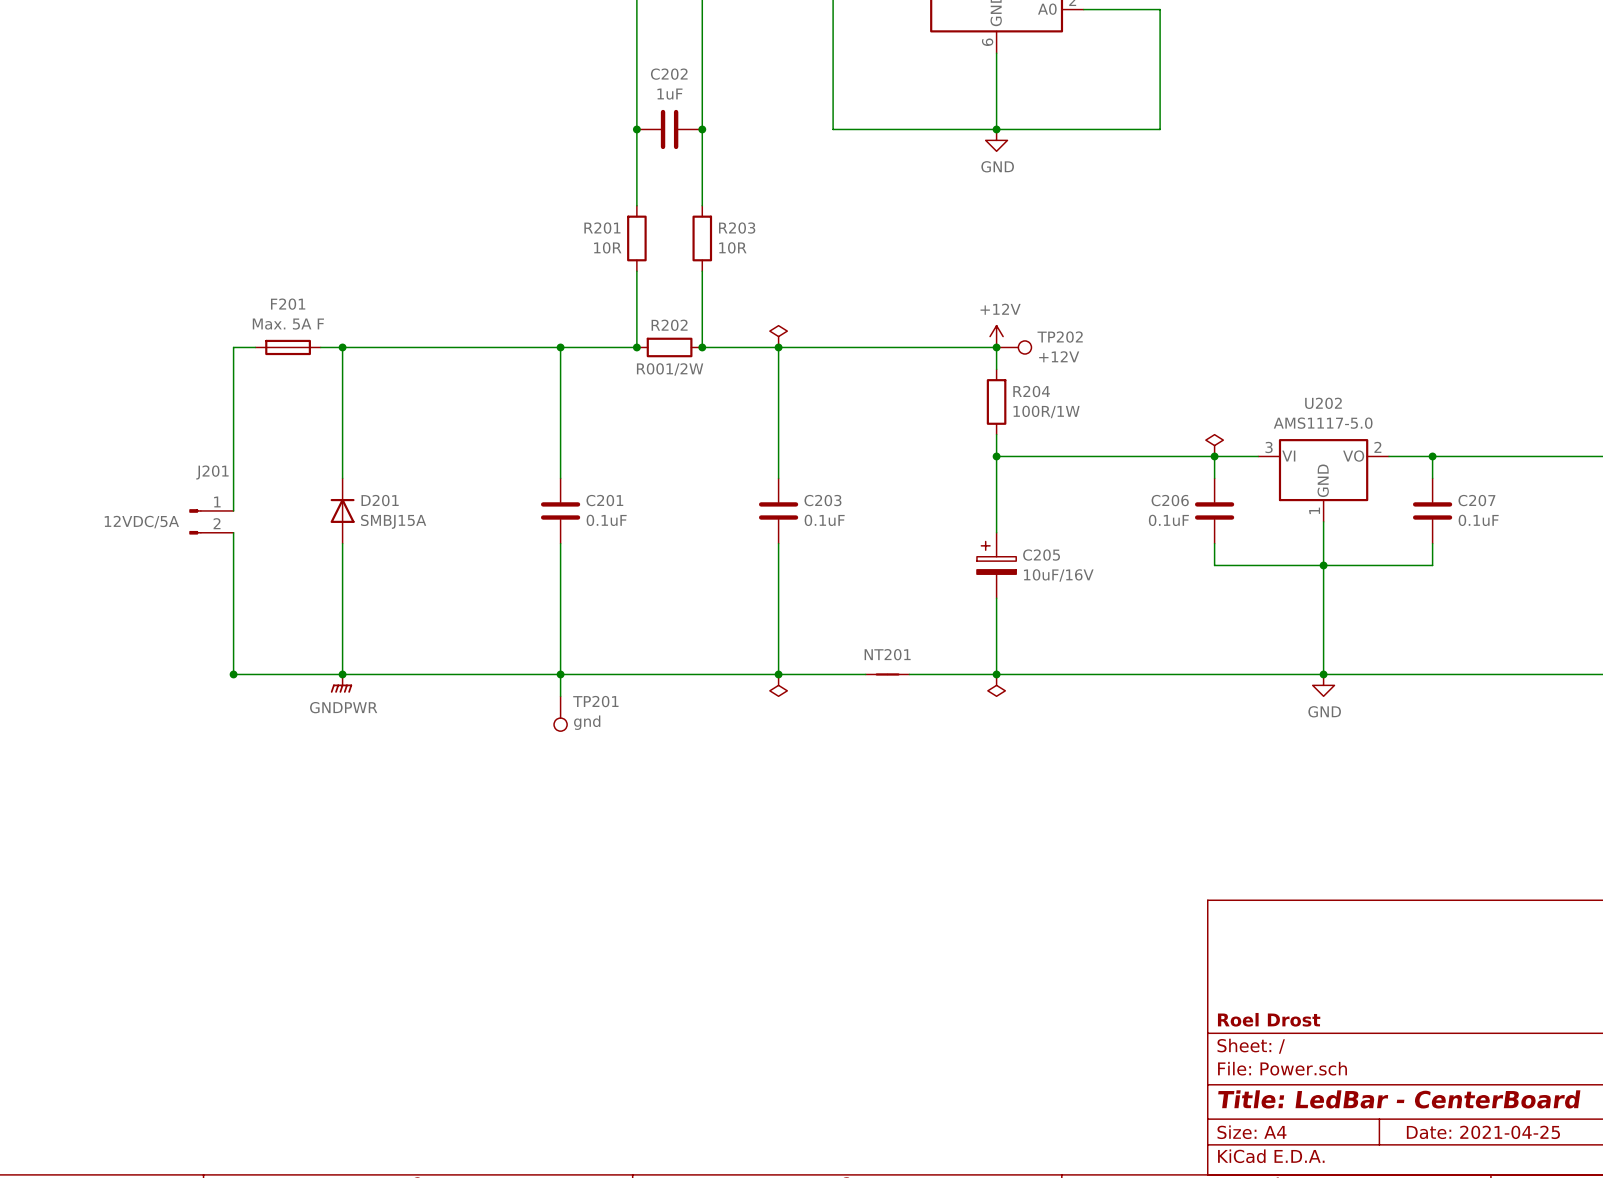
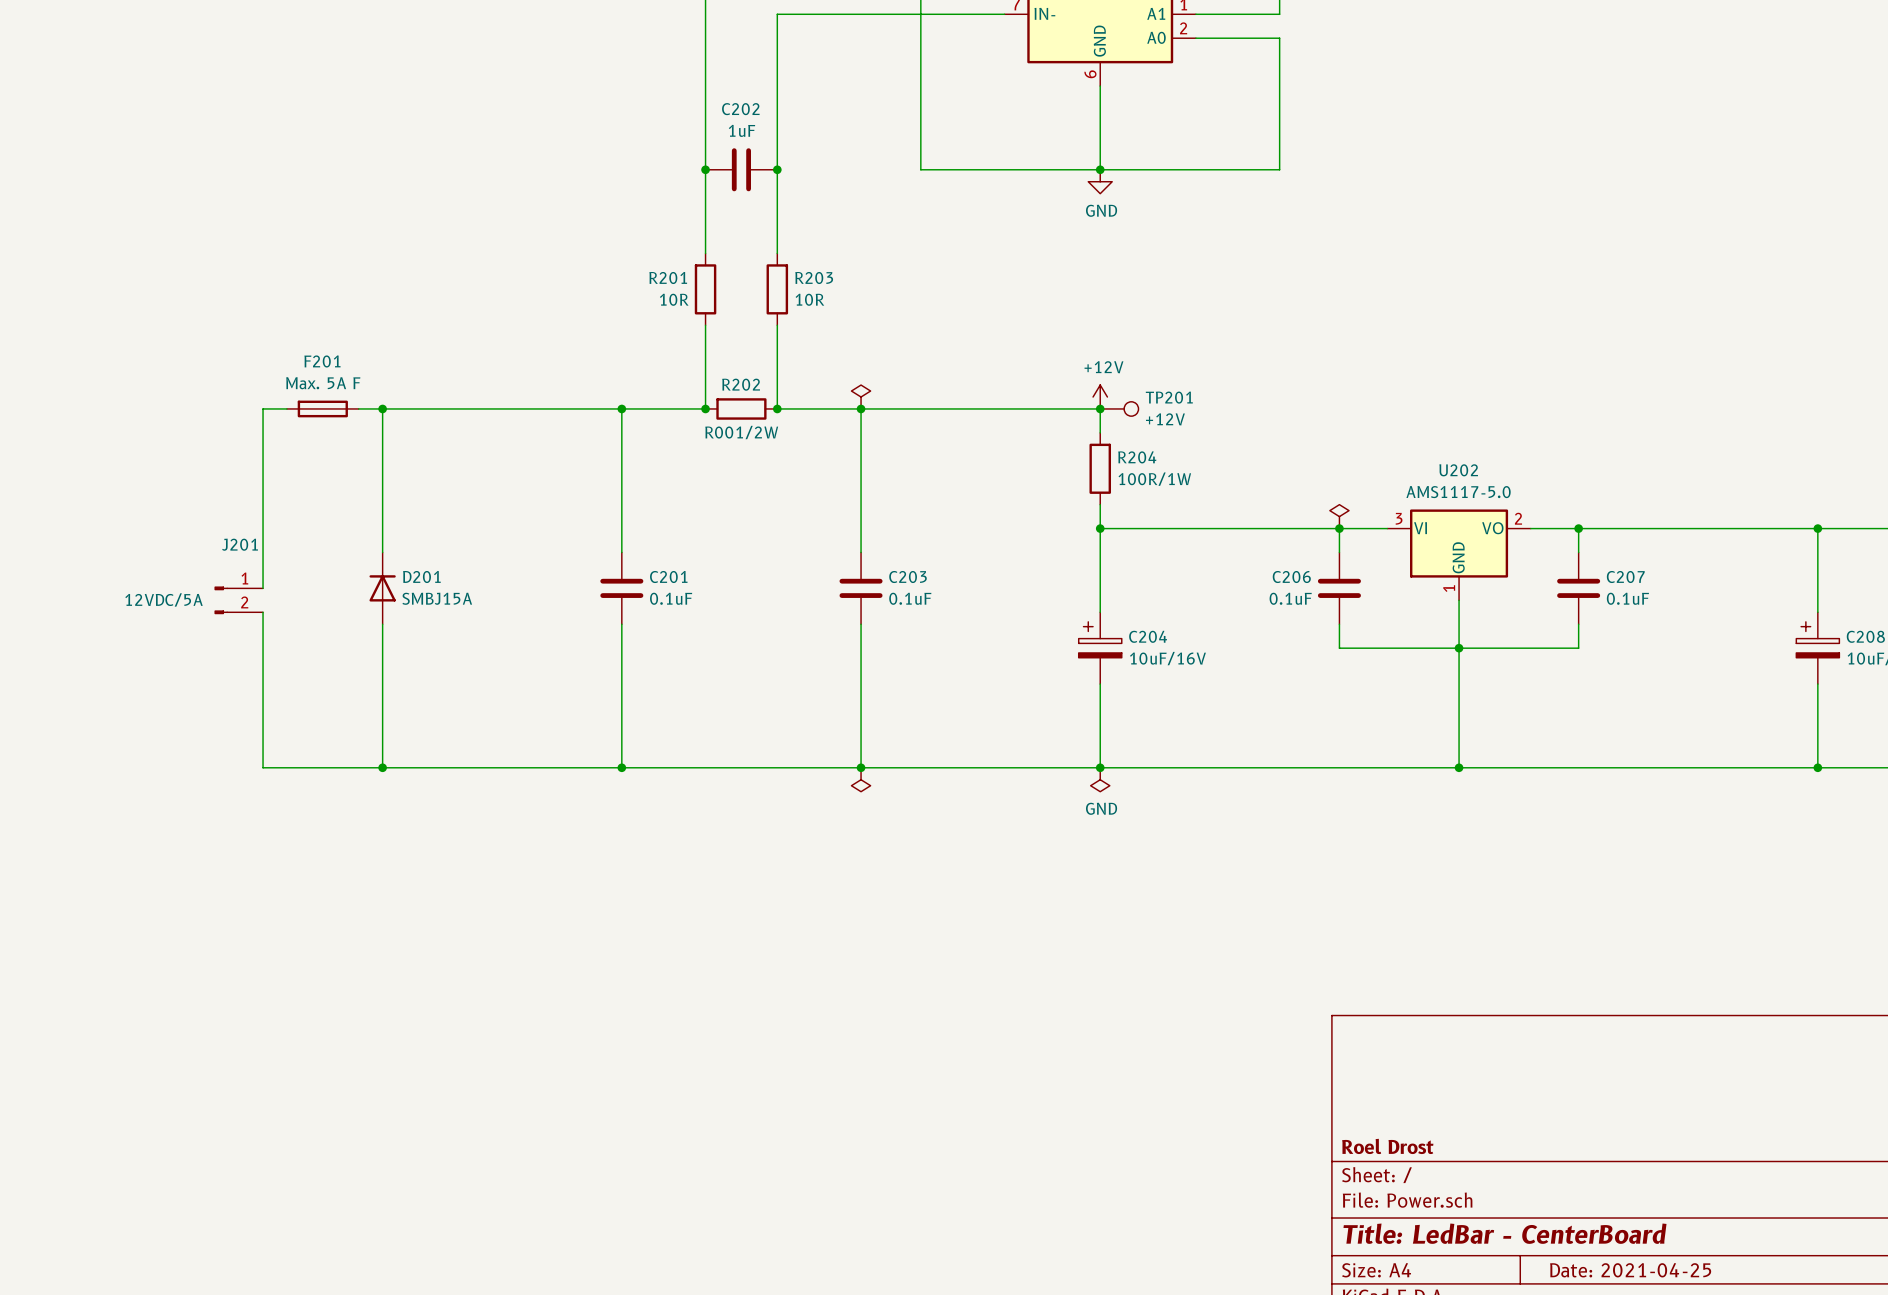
TP202 name: TP202 (1060, 337) -> TP201 (1169, 397)
C205 name: C205 (1041, 555) -> C204 (1148, 636)
junction: (233, 674) -> none
wire: (560, 674) (560, 696) -> none
NT201: (887, 674) -> none
power symbol: GNDPWR (341, 683) -> none
power symbol: GND (1323, 685) -> none
power symbol text: none -> GND (1101, 808)
TP201: gnd (560, 713) -> none

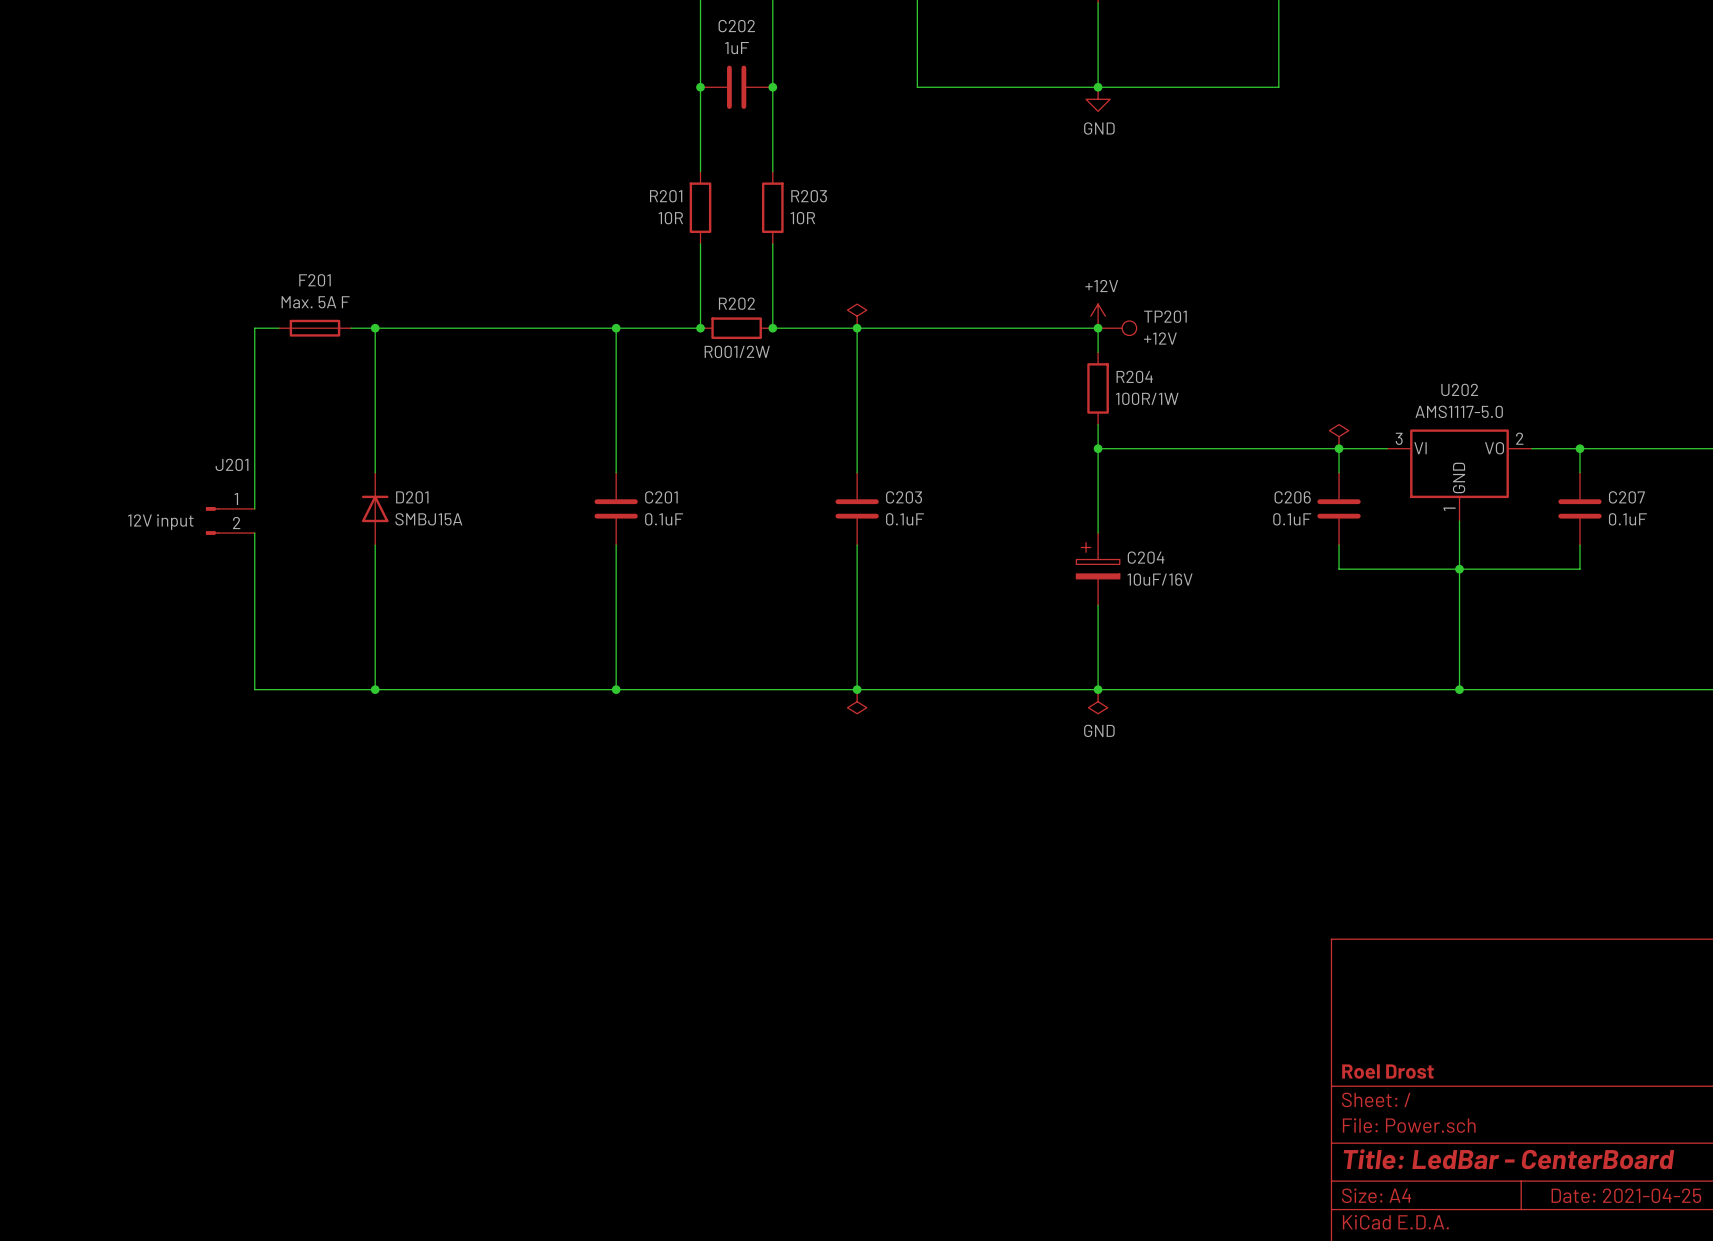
J201 value: 12VDC/5A (164, 599) -> 12V input (160, 522)

